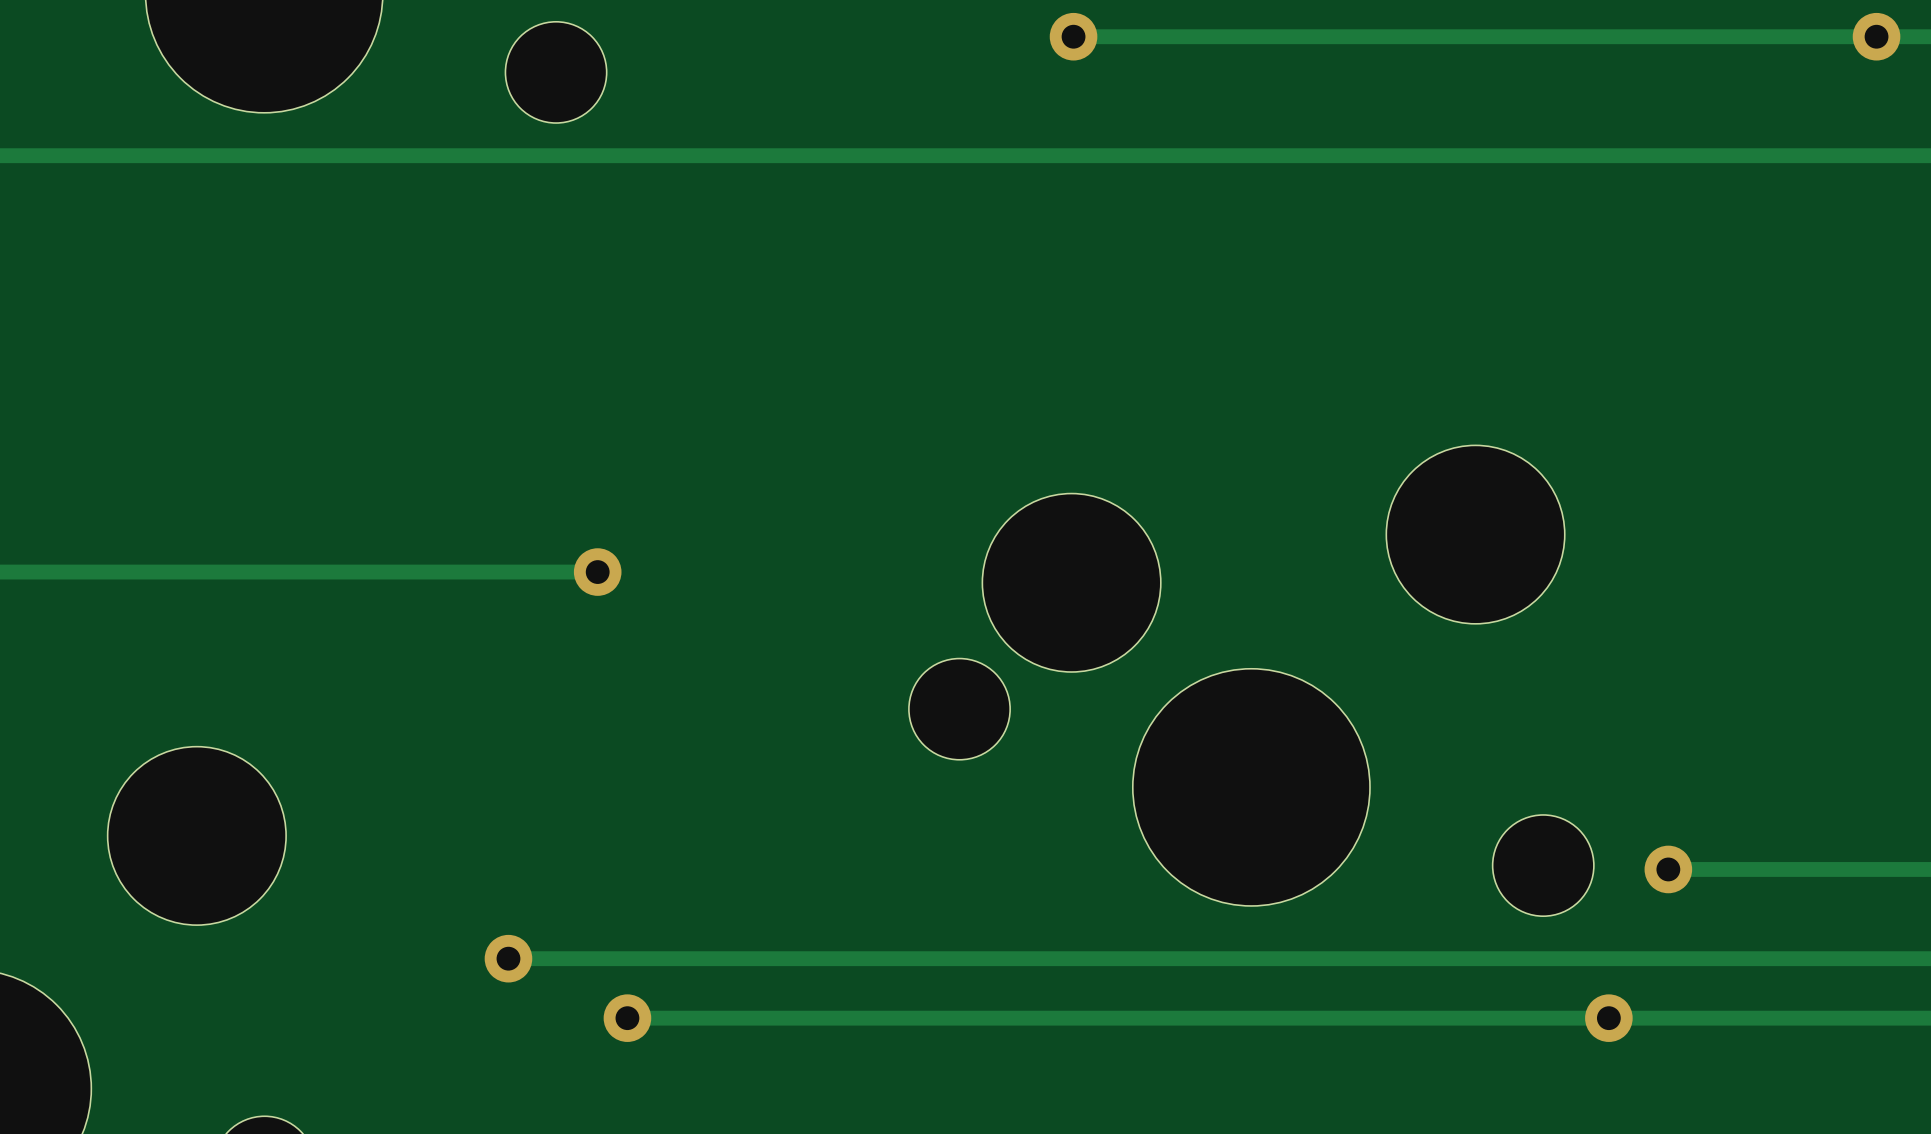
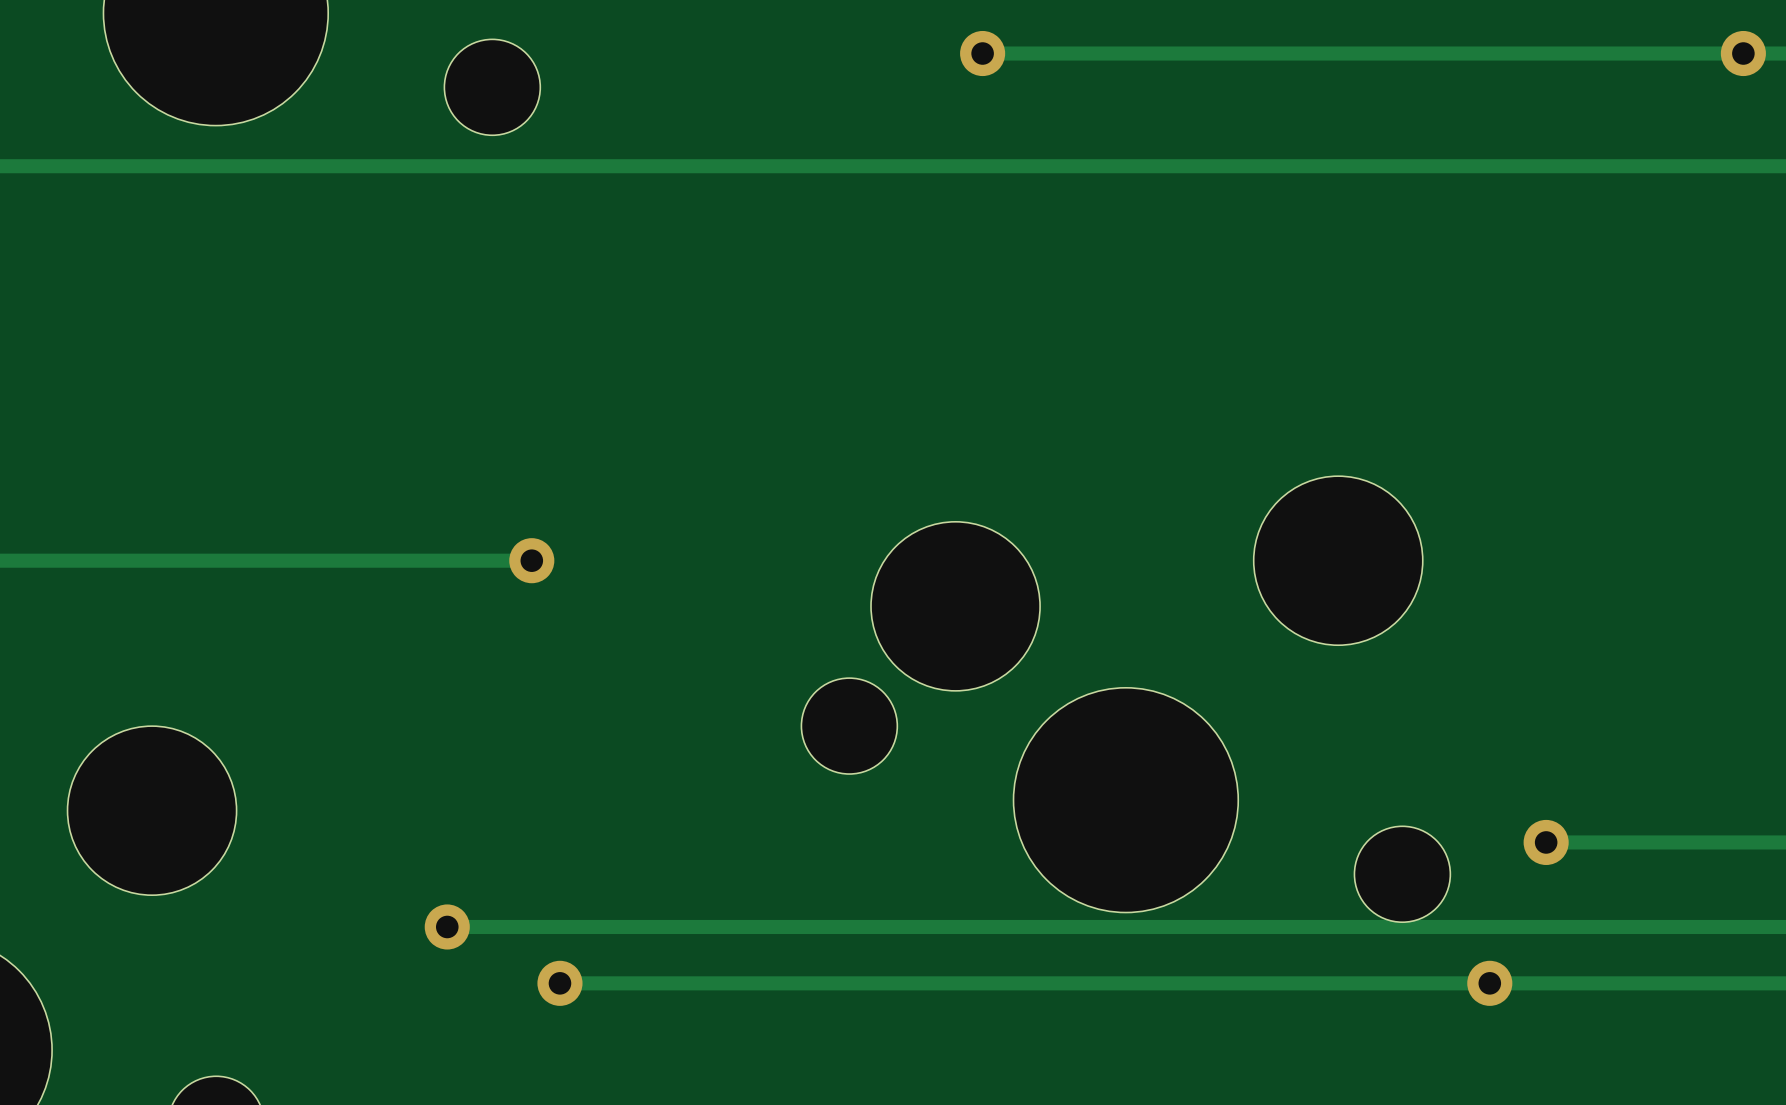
part position: (1251, 680) -> (1125, 699)

